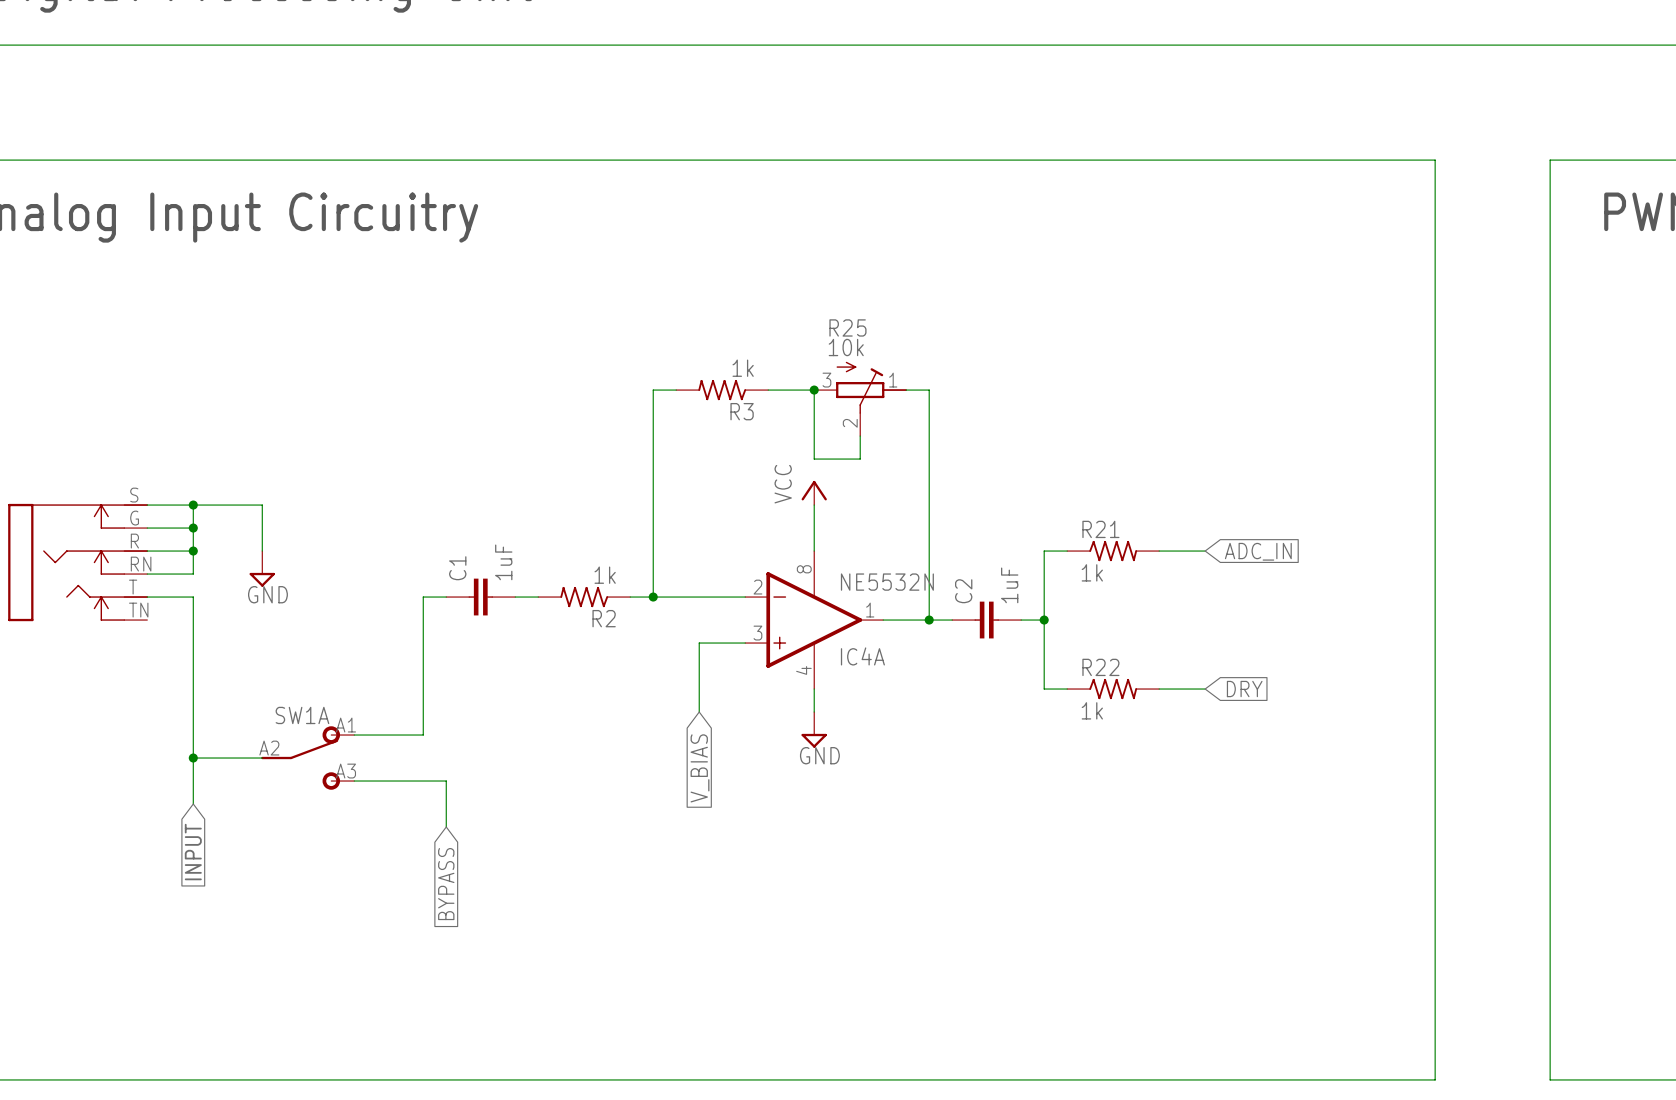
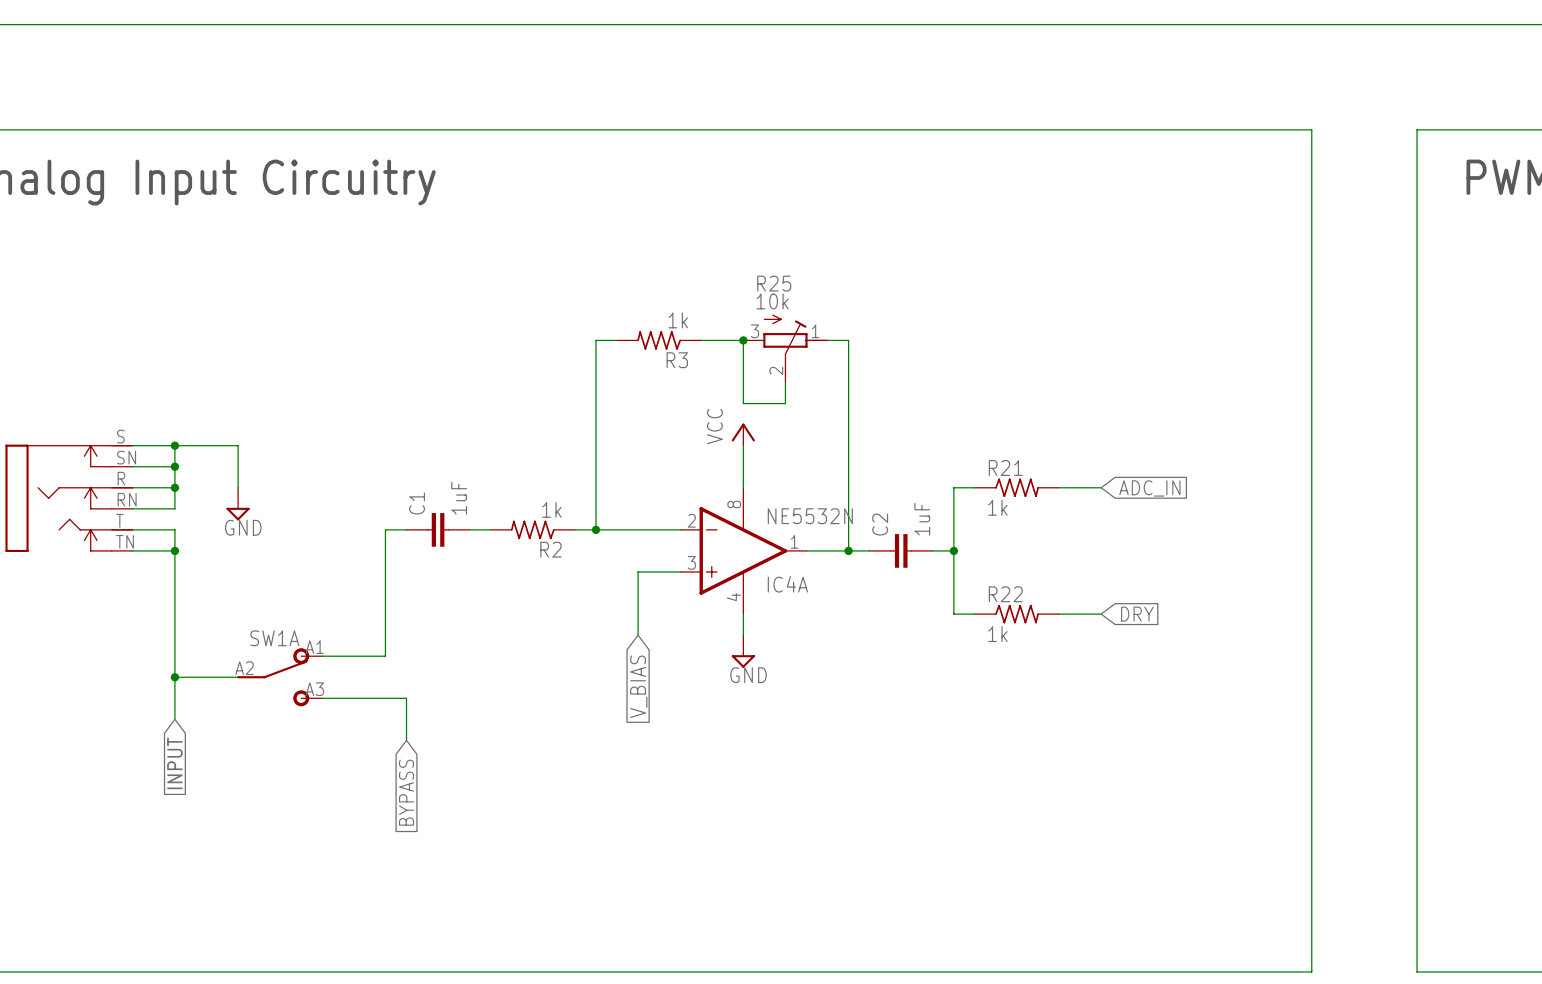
part pin number: G (134, 518) -> SN (126, 457)
wire: none -> (132, 550) (174, 550)
junction: none -> (174, 550)

